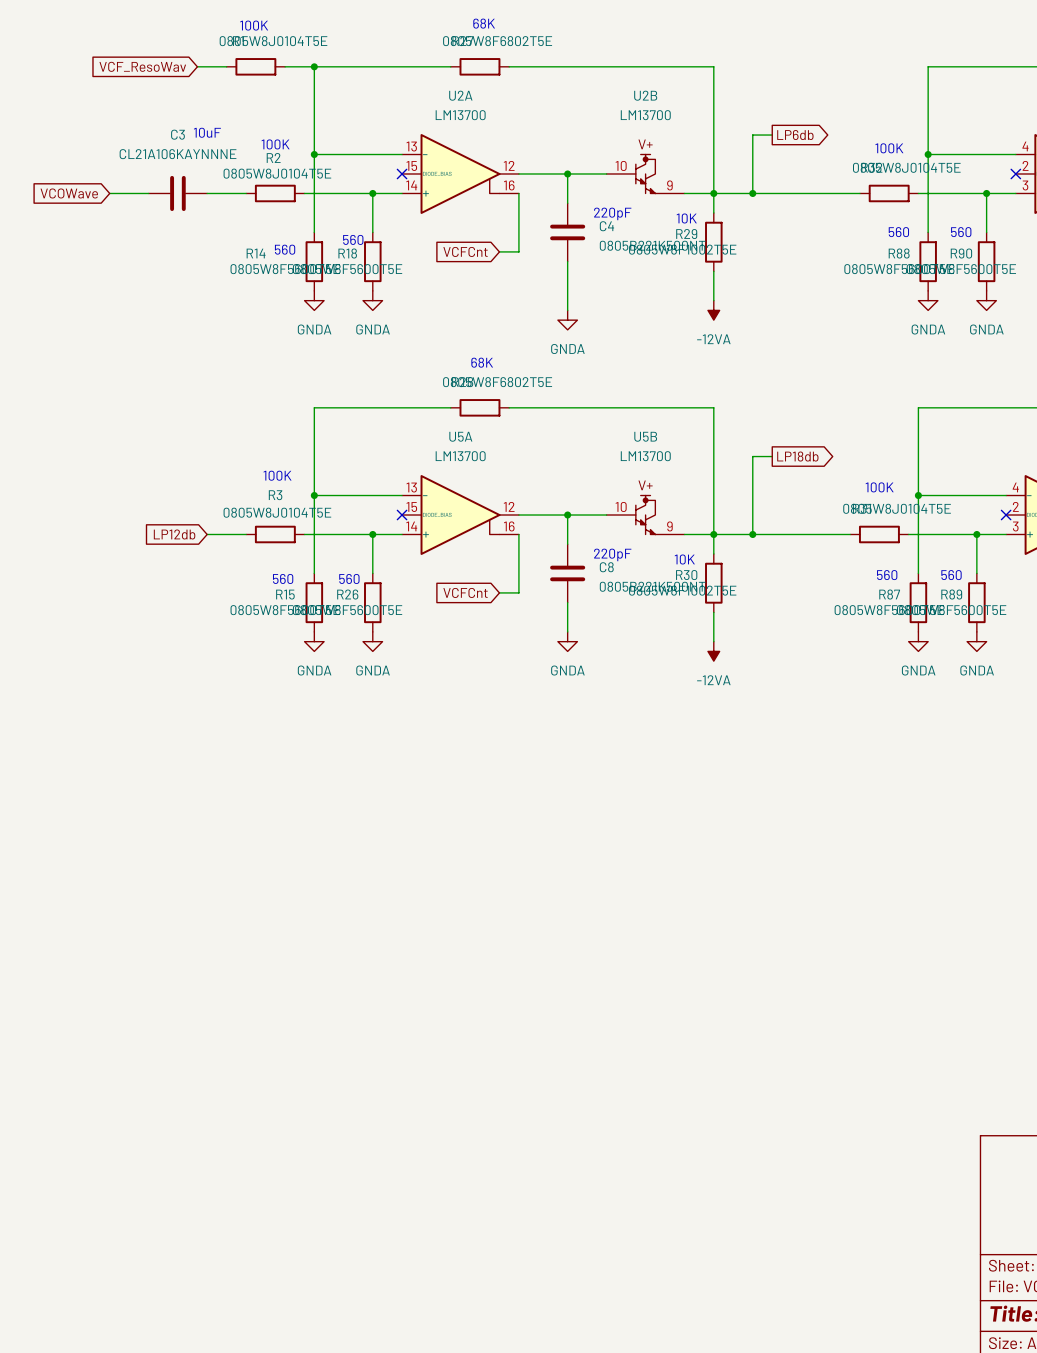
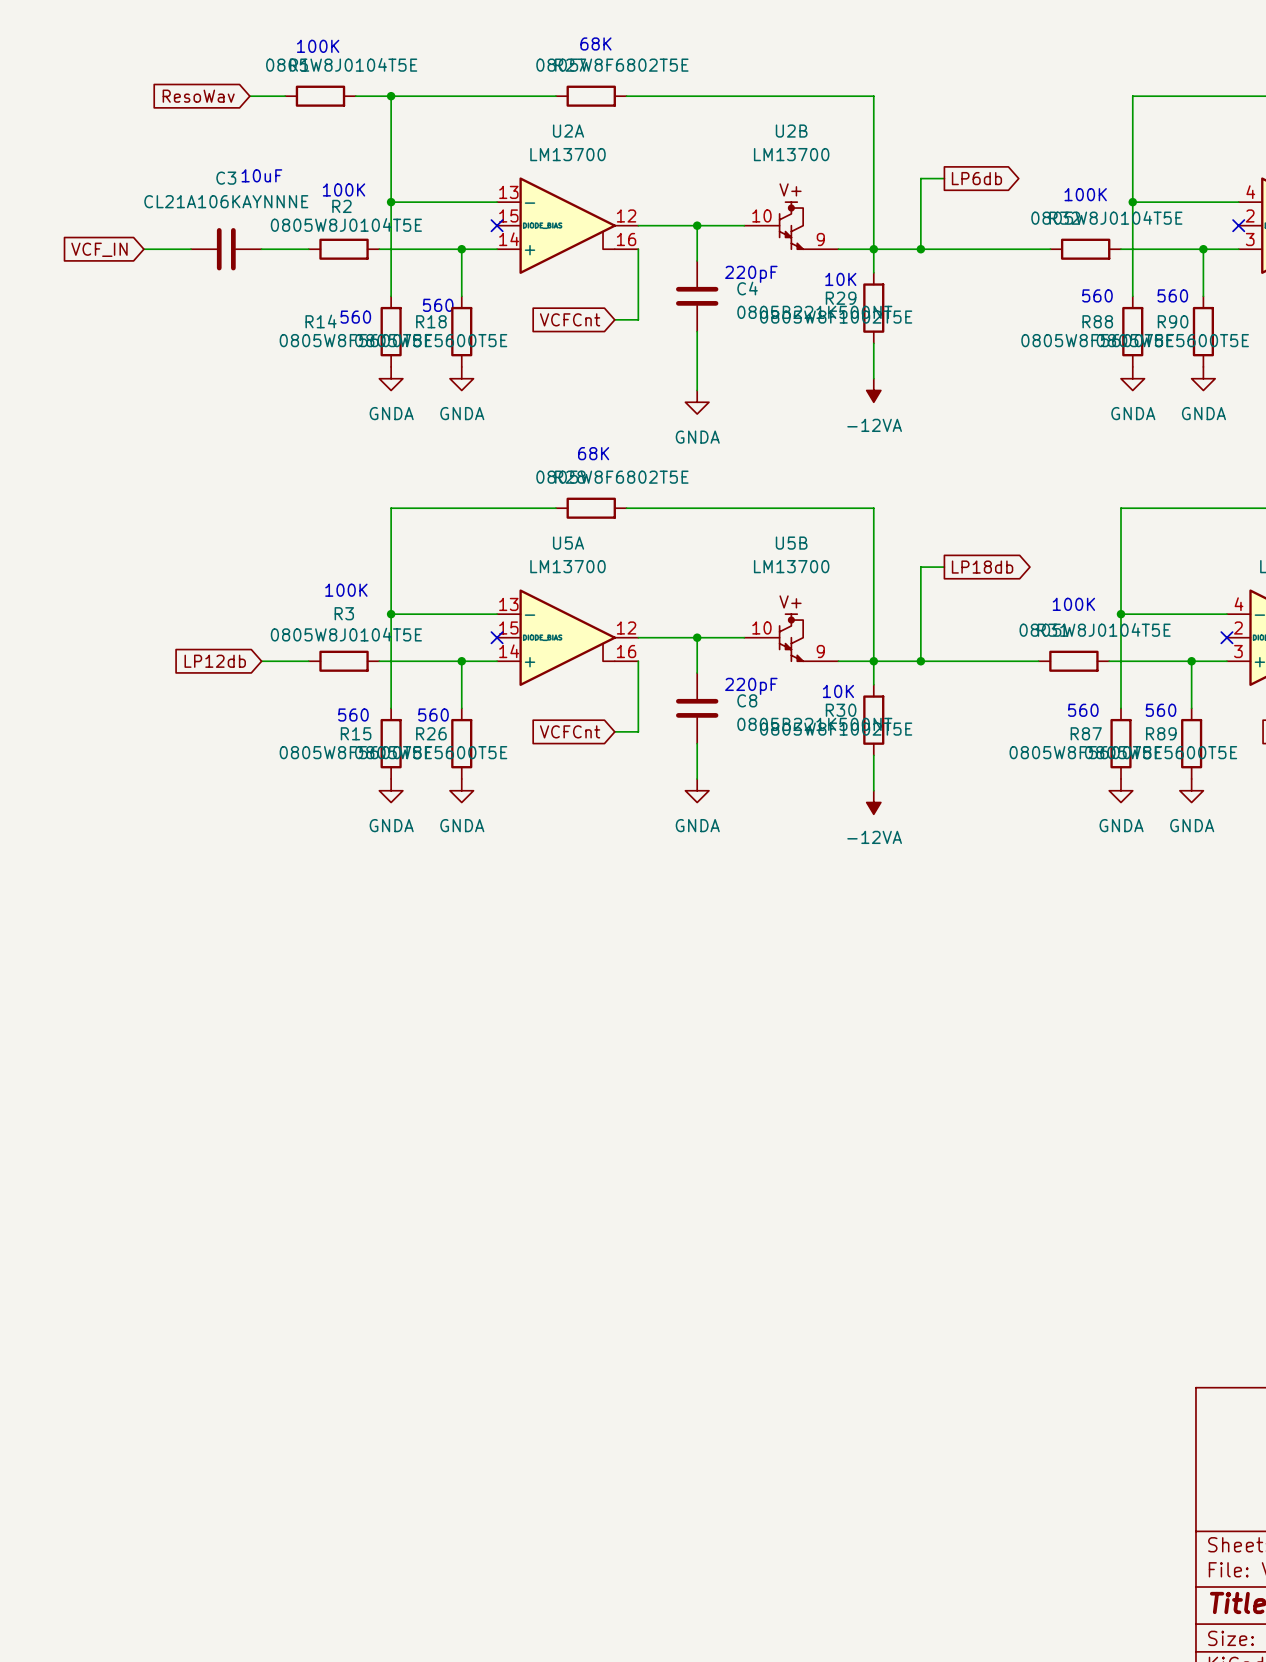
global label: VCF_ResoWav (142, 66) -> ResoWav (198, 96)
global label: VCOWave (69, 193) -> VCF_IN (99, 249)

